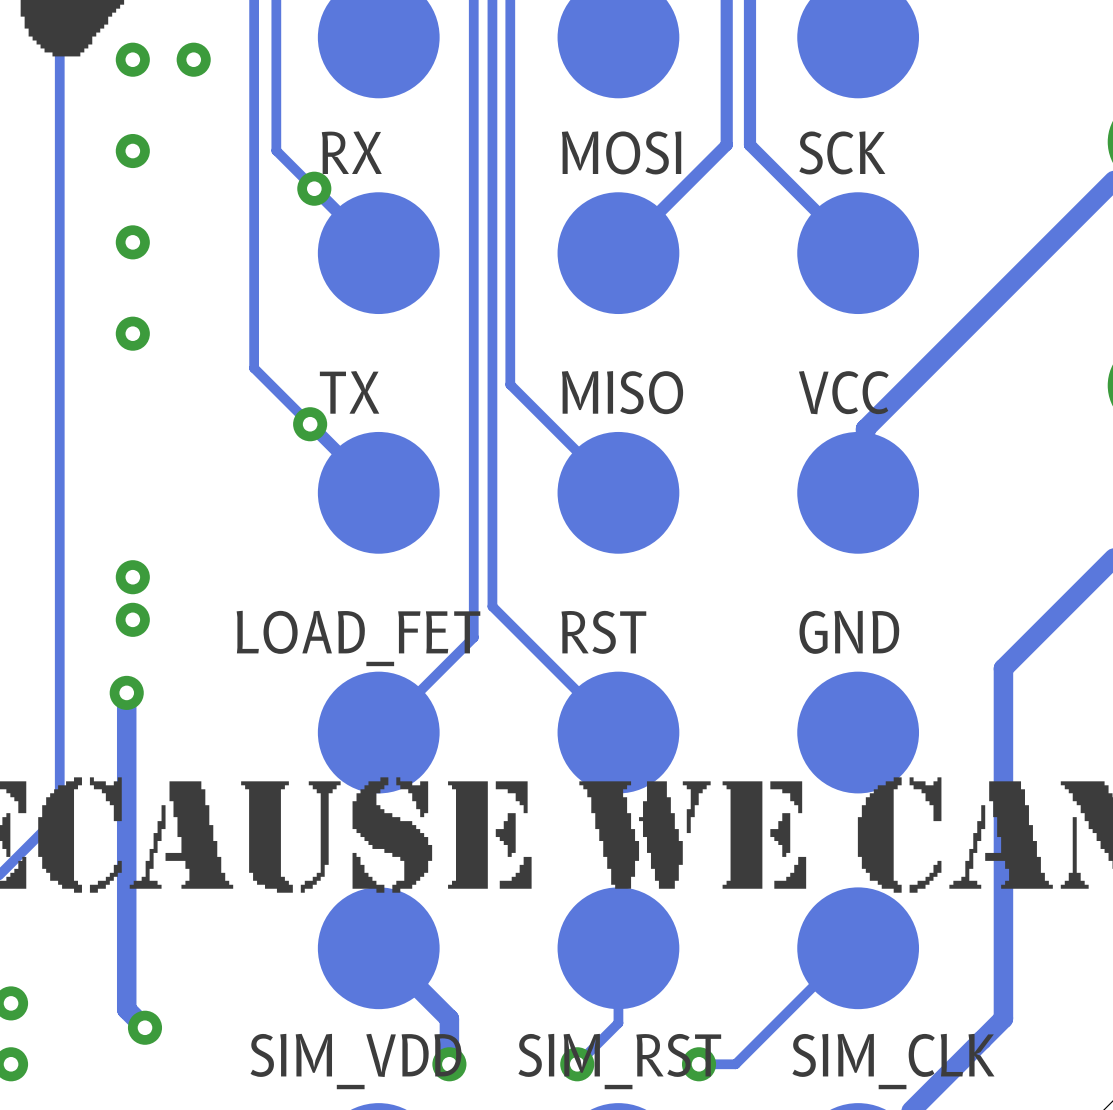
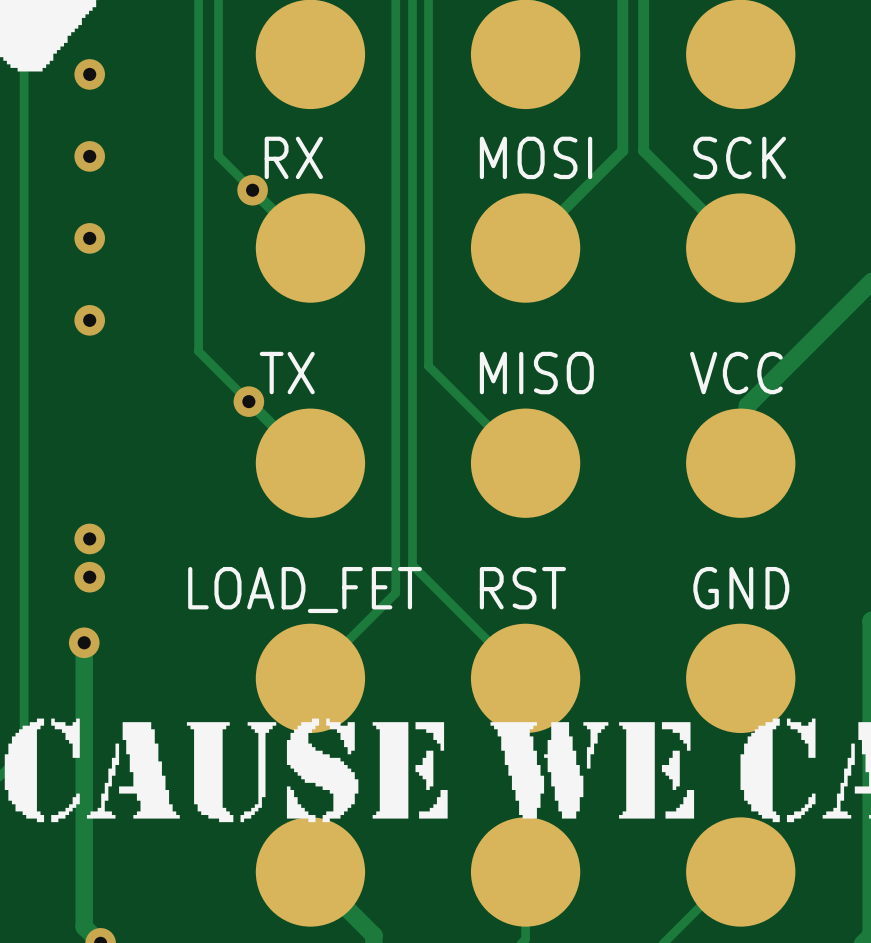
via: (193, 59) -> none

